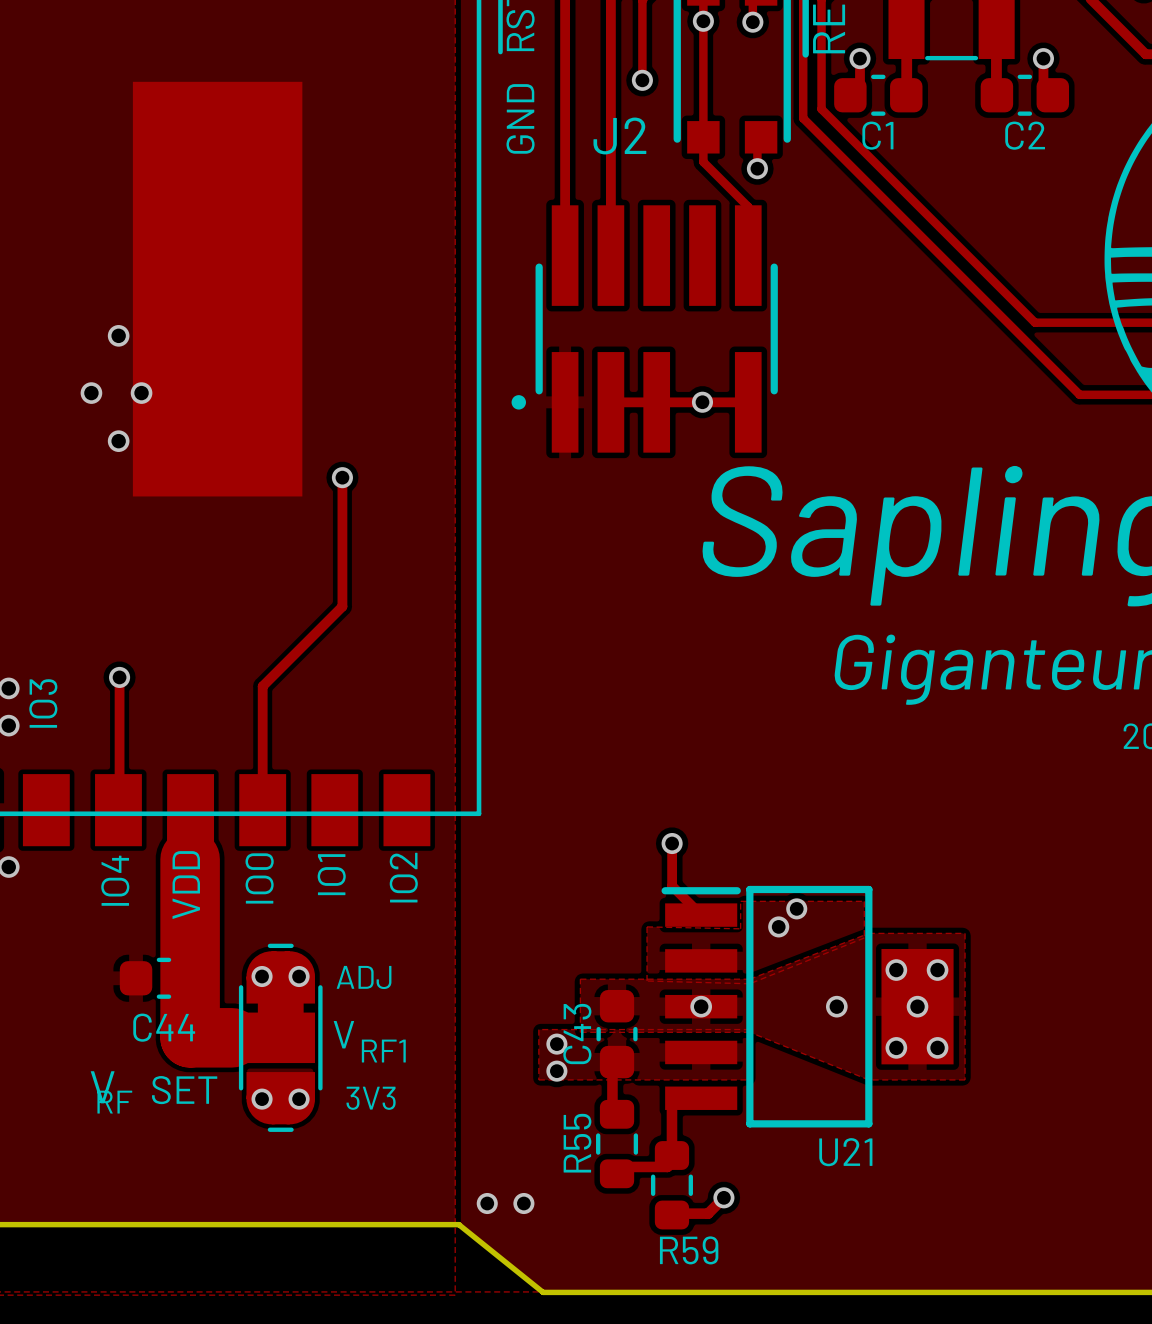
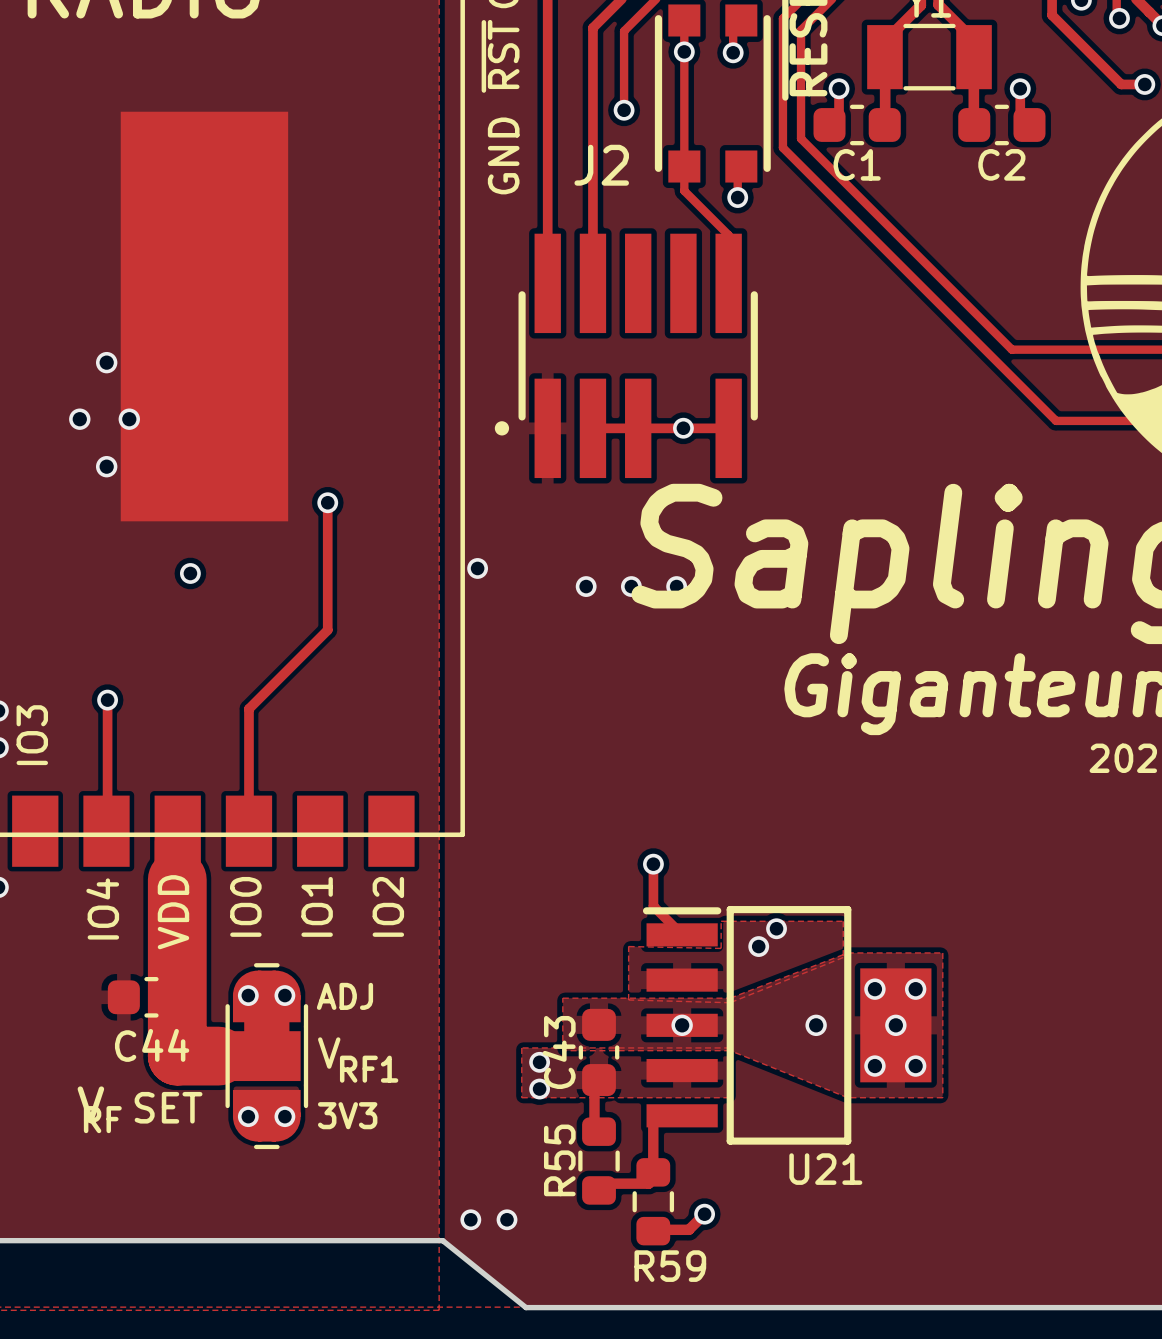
via: none -> (477, 568)
via: none -> (190, 573)
via: none -> (586, 586)
via: none -> (631, 586)
via: none -> (676, 586)

